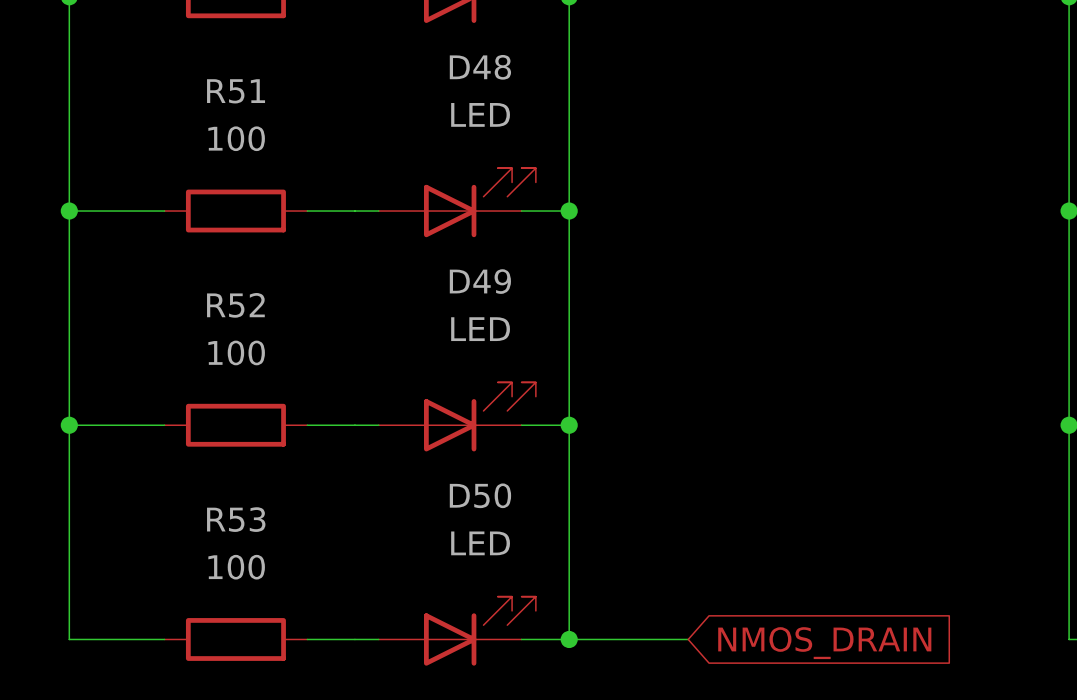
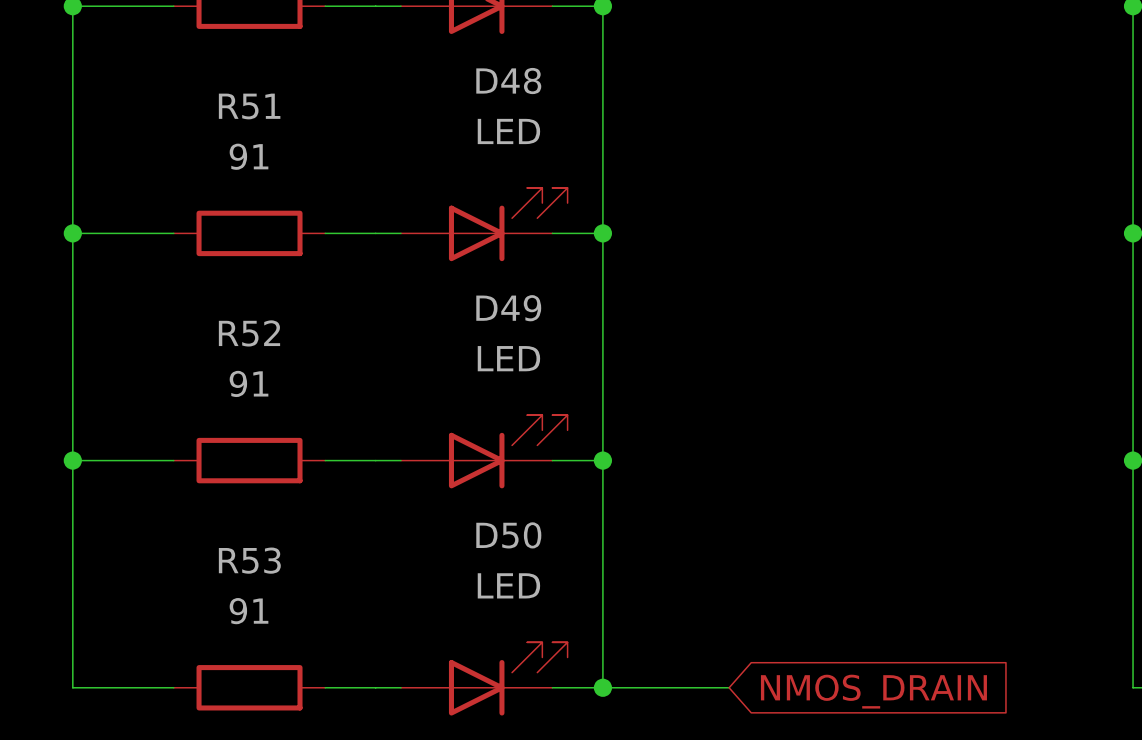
R51 value: 100 (236, 138) -> 91 (249, 156)
R52 value: 100 (236, 352) -> 91 (249, 383)
R53 value: 100 (236, 567) -> 91 (249, 611)

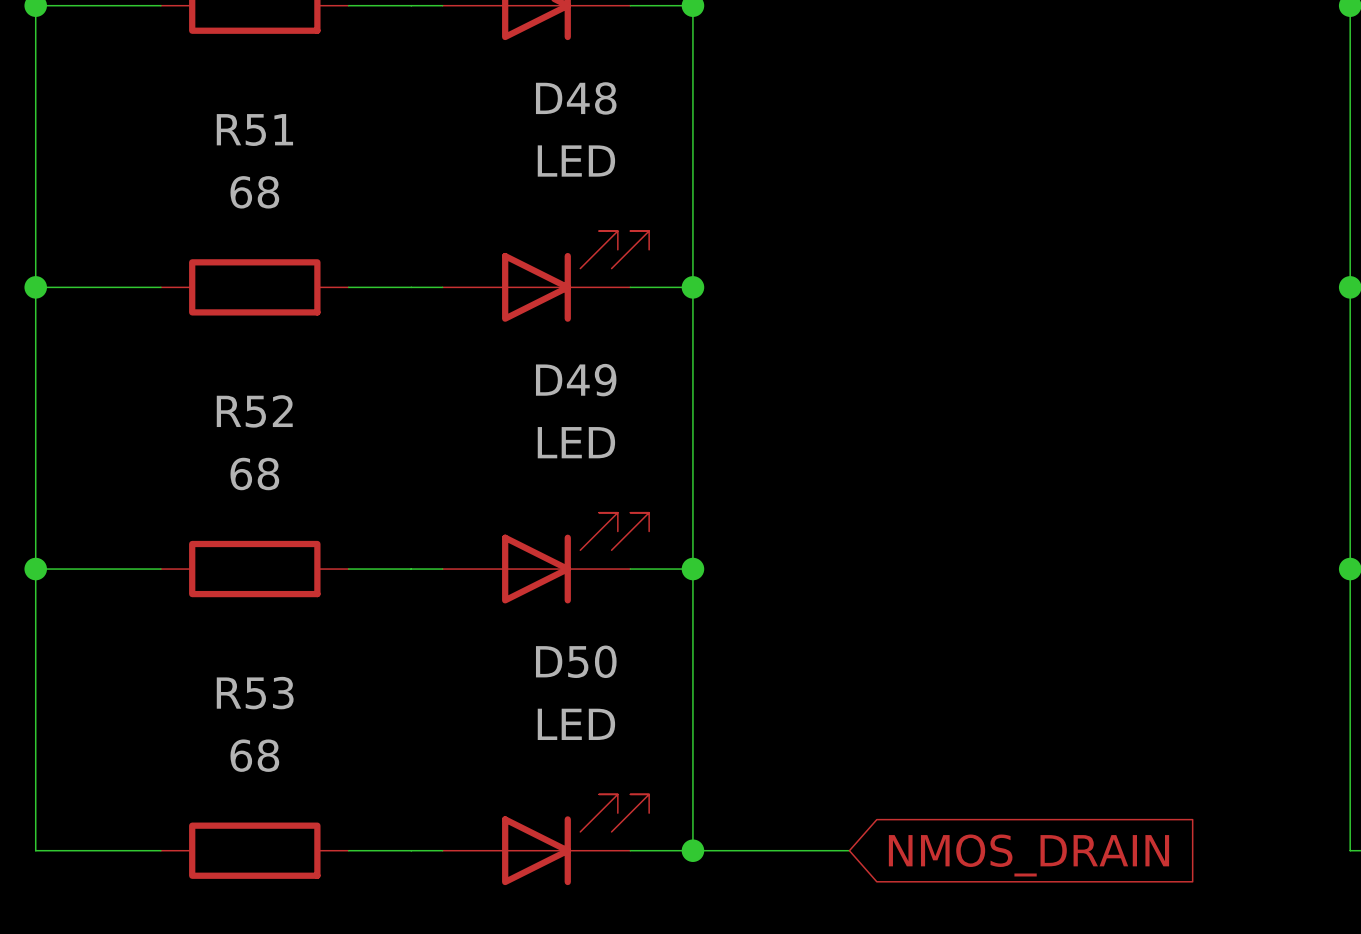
R51 value: 91 (249, 156) -> 68 (254, 192)
R52 value: 91 (249, 383) -> 68 (254, 474)
R53 value: 91 (249, 611) -> 68 (254, 755)

